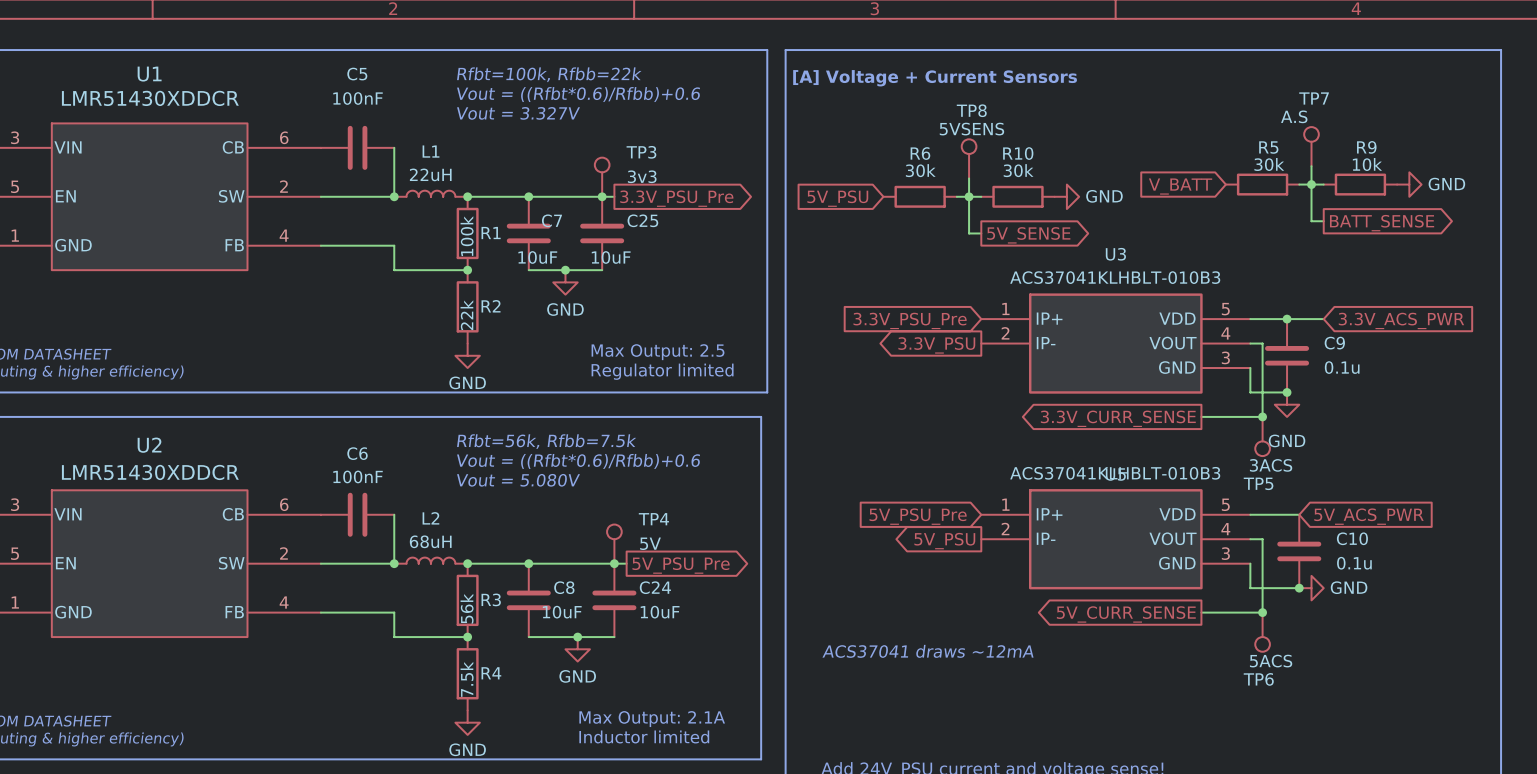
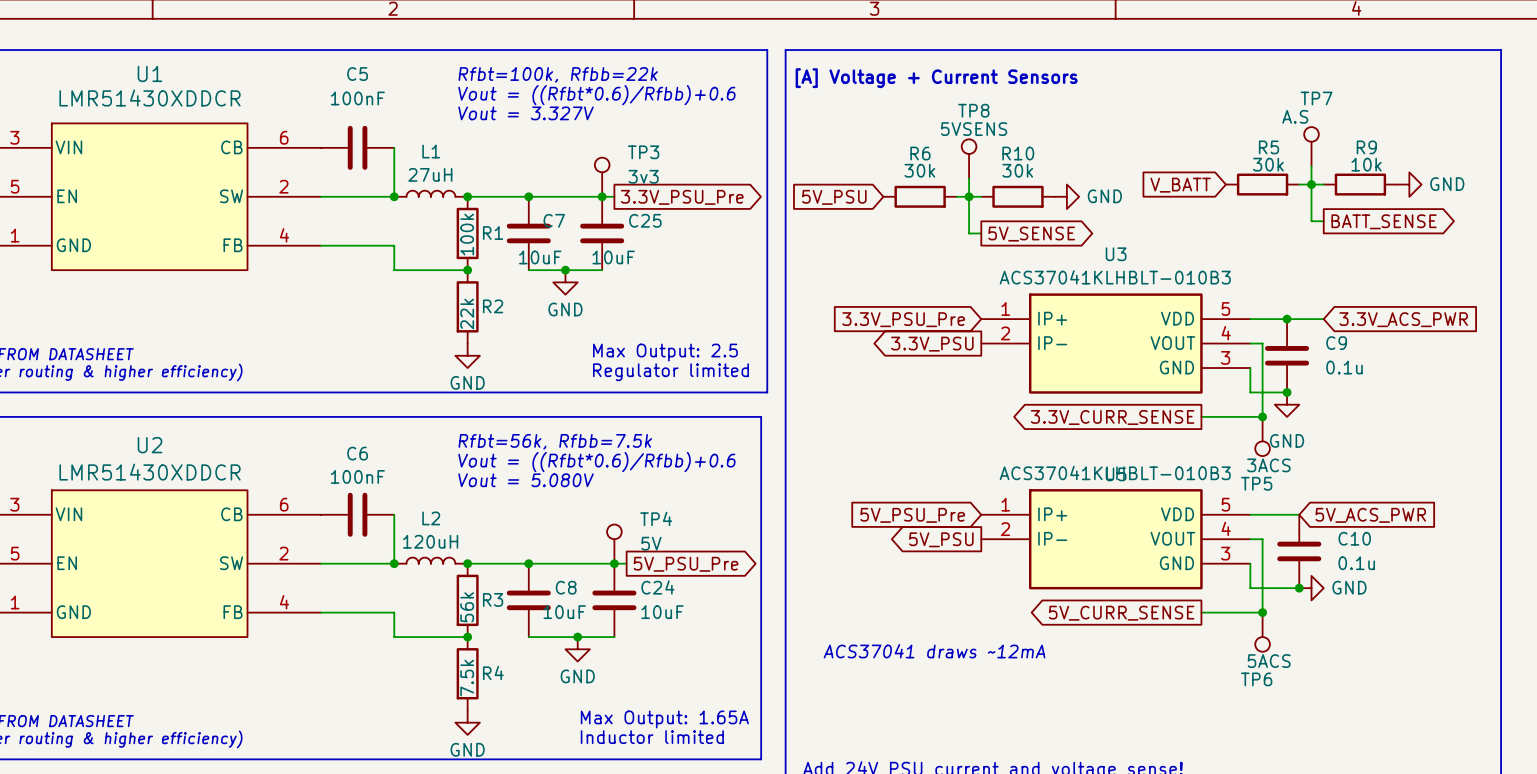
L1 value: 22uH (430, 174) -> 27uH (430, 174)
L2 value: 68uH (430, 541) -> 120uH (430, 541)
text: Max Output: 2.1A (652, 719) -> Max Output: 1.65A (664, 719)

